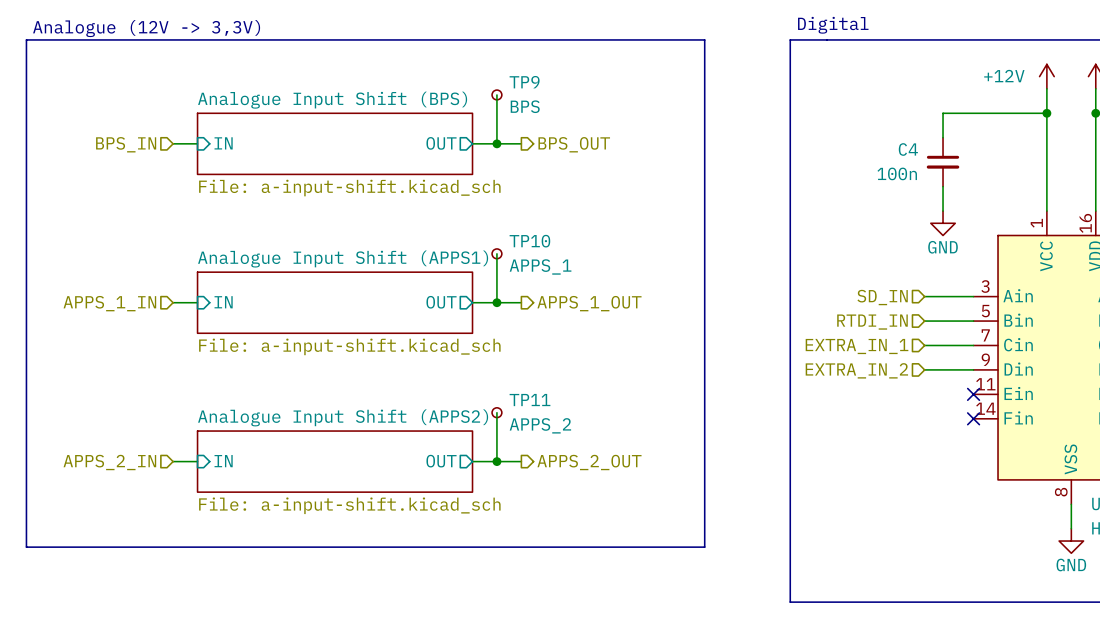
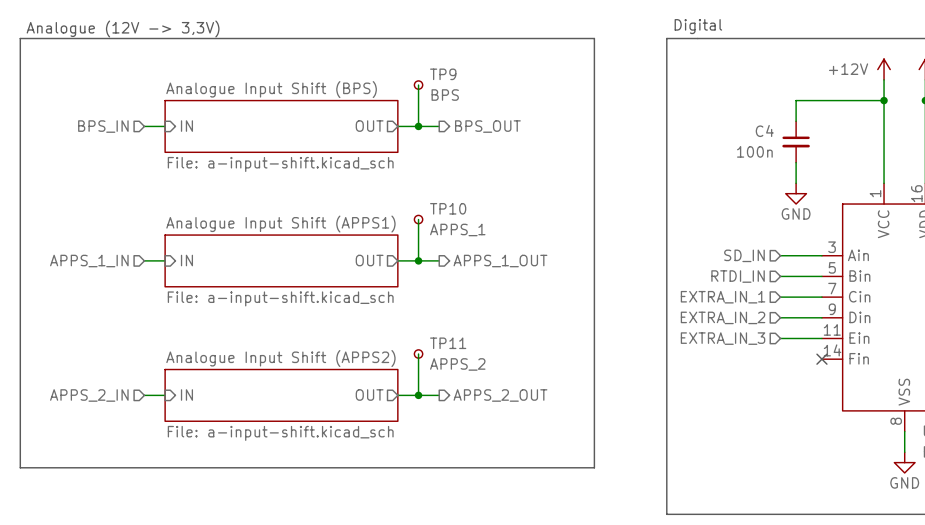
wire: none -> (780, 338) (821, 338)
no-connect mark: (973, 394) -> none
hierarchical label: none -> EXTRA_IN_3 (723, 338)

